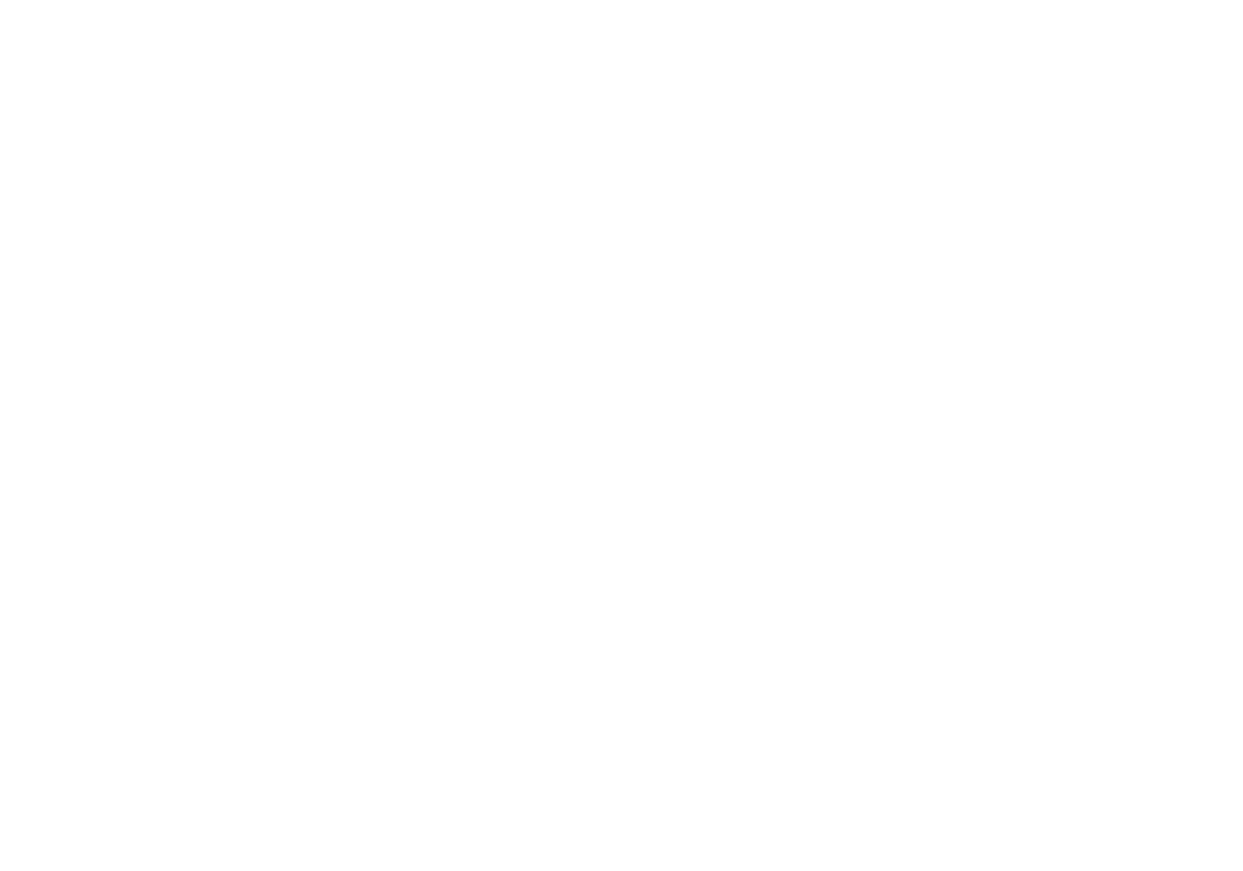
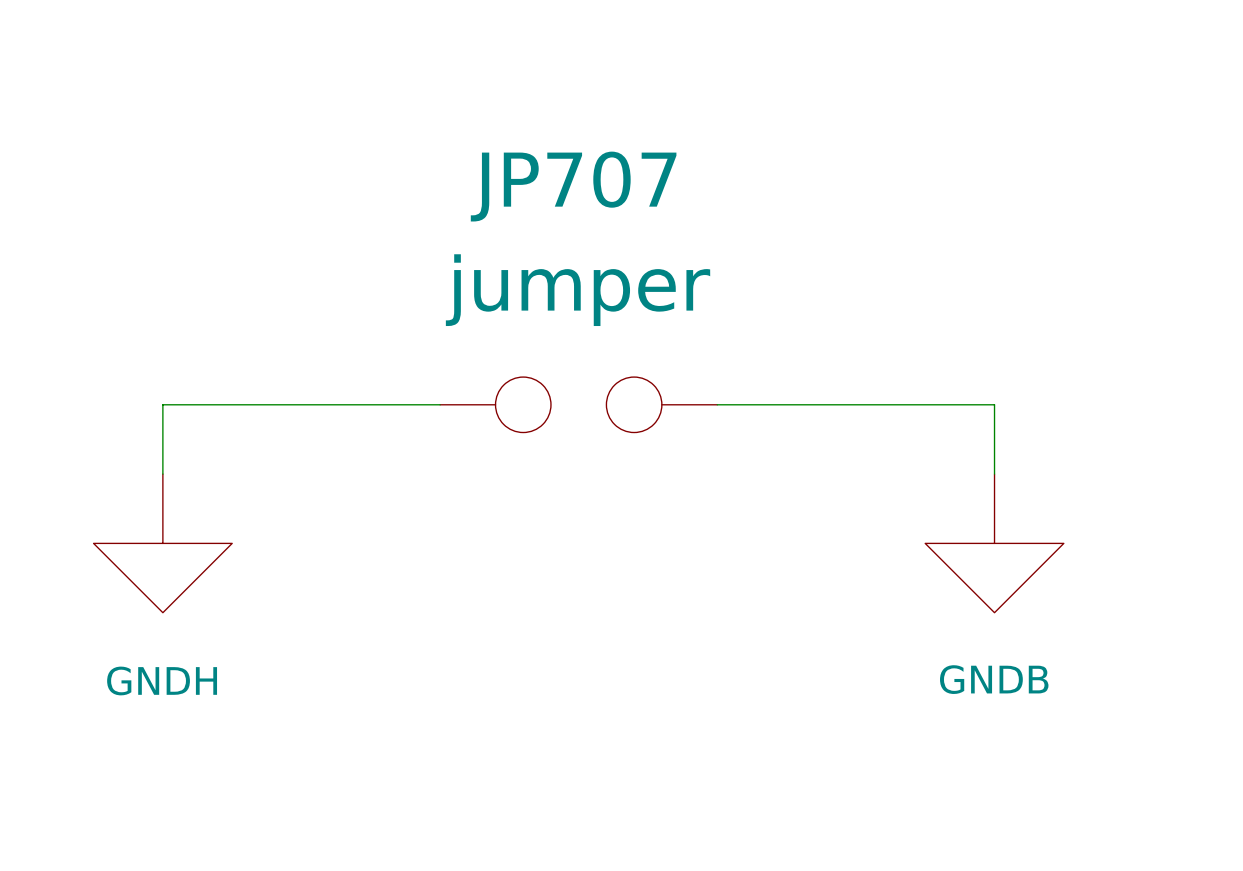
wire: none -> (440, 404) (162, 404) (162, 474)
JP707: none -> jumper (578, 404)
wire: none -> (717, 404) (994, 404) (994, 474)
power symbol: none -> GNDH (162, 543)
power symbol: none -> GNDB (994, 543)

